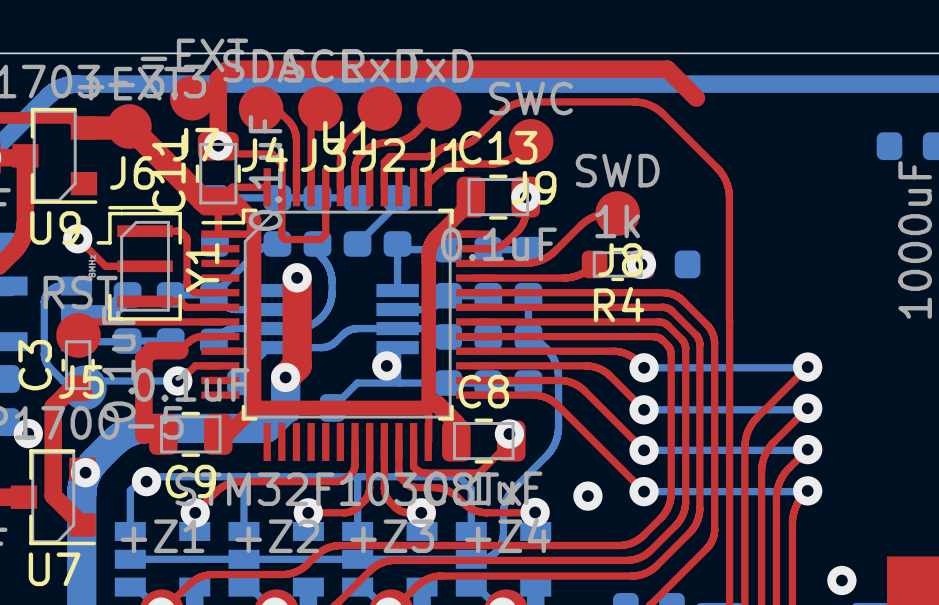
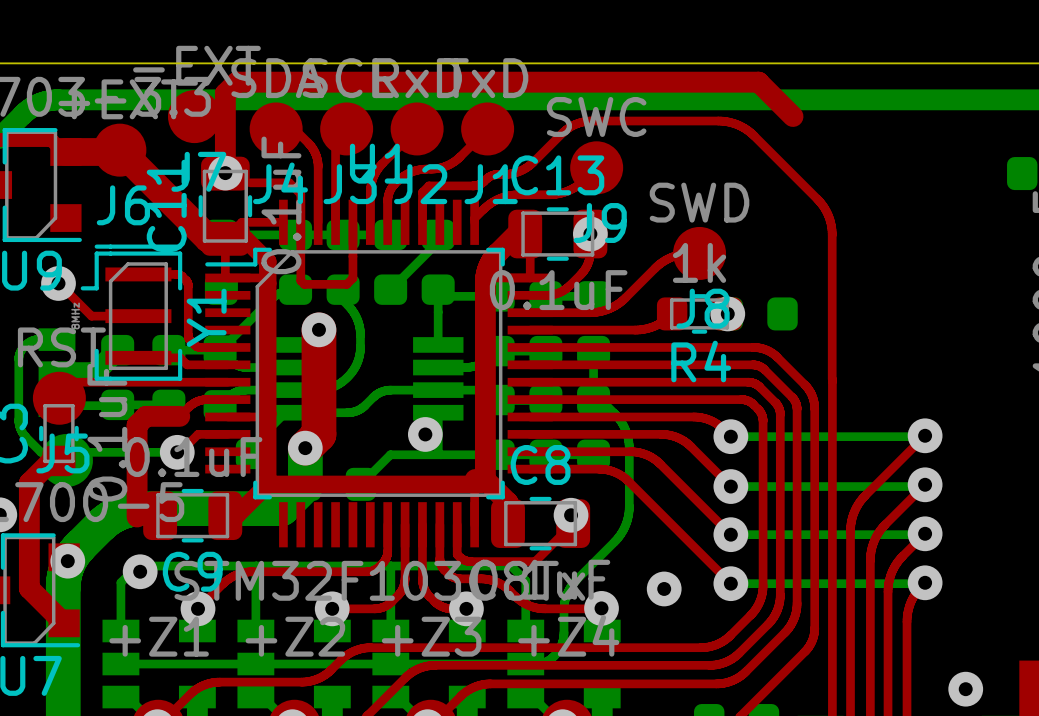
top track: (470, 197) (470, 202) (434, 239) (429, 251) (428, 441) -> (530, 277) (530, 239) (525, 234) (516, 234) (493, 257) (485, 276) (485, 479) (480, 484) (470, 484) (474, 488) (474, 524)

